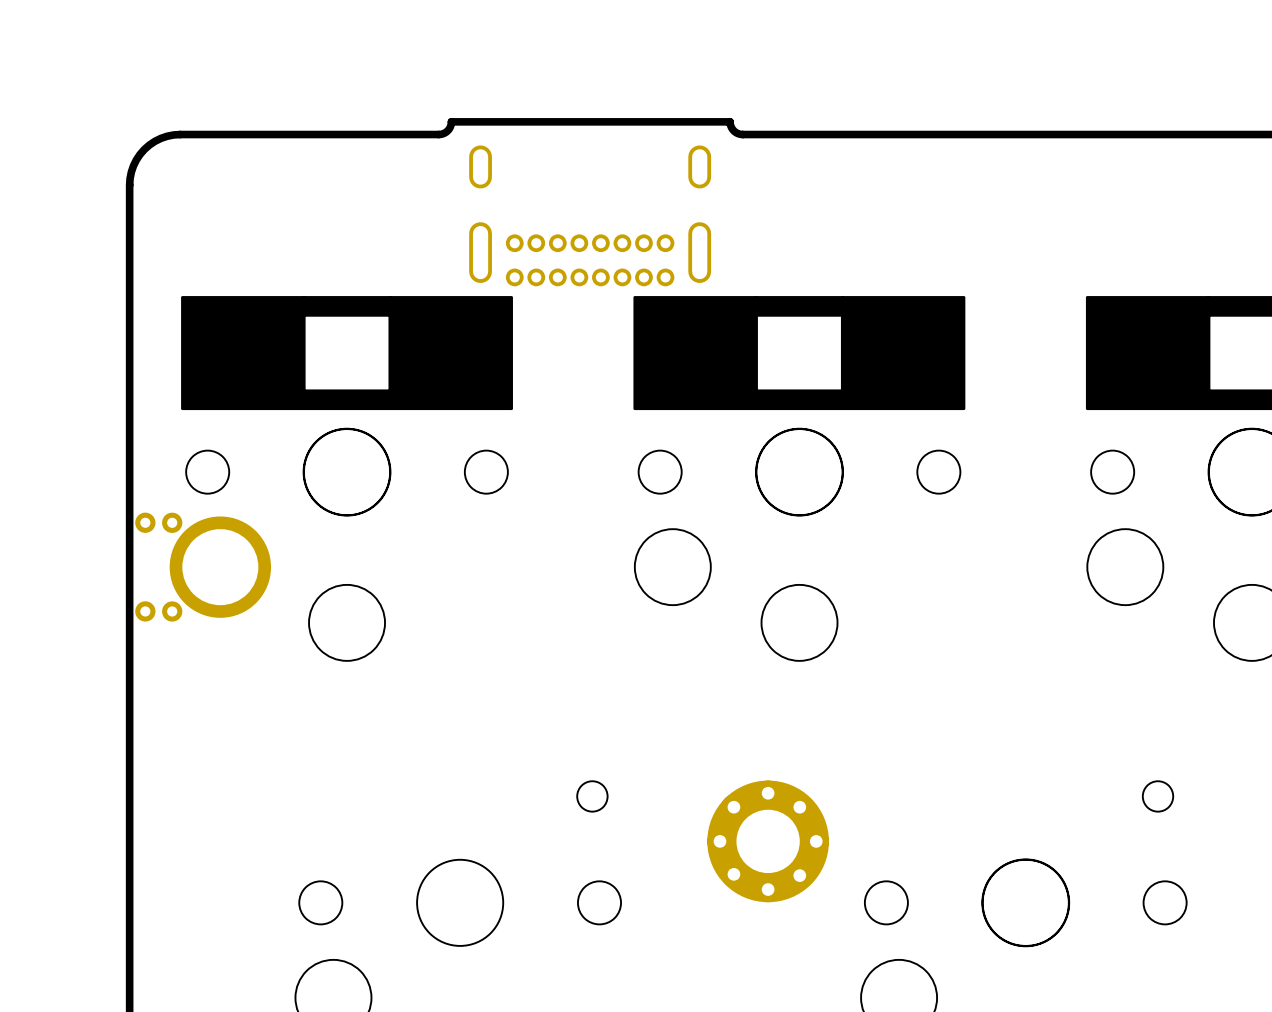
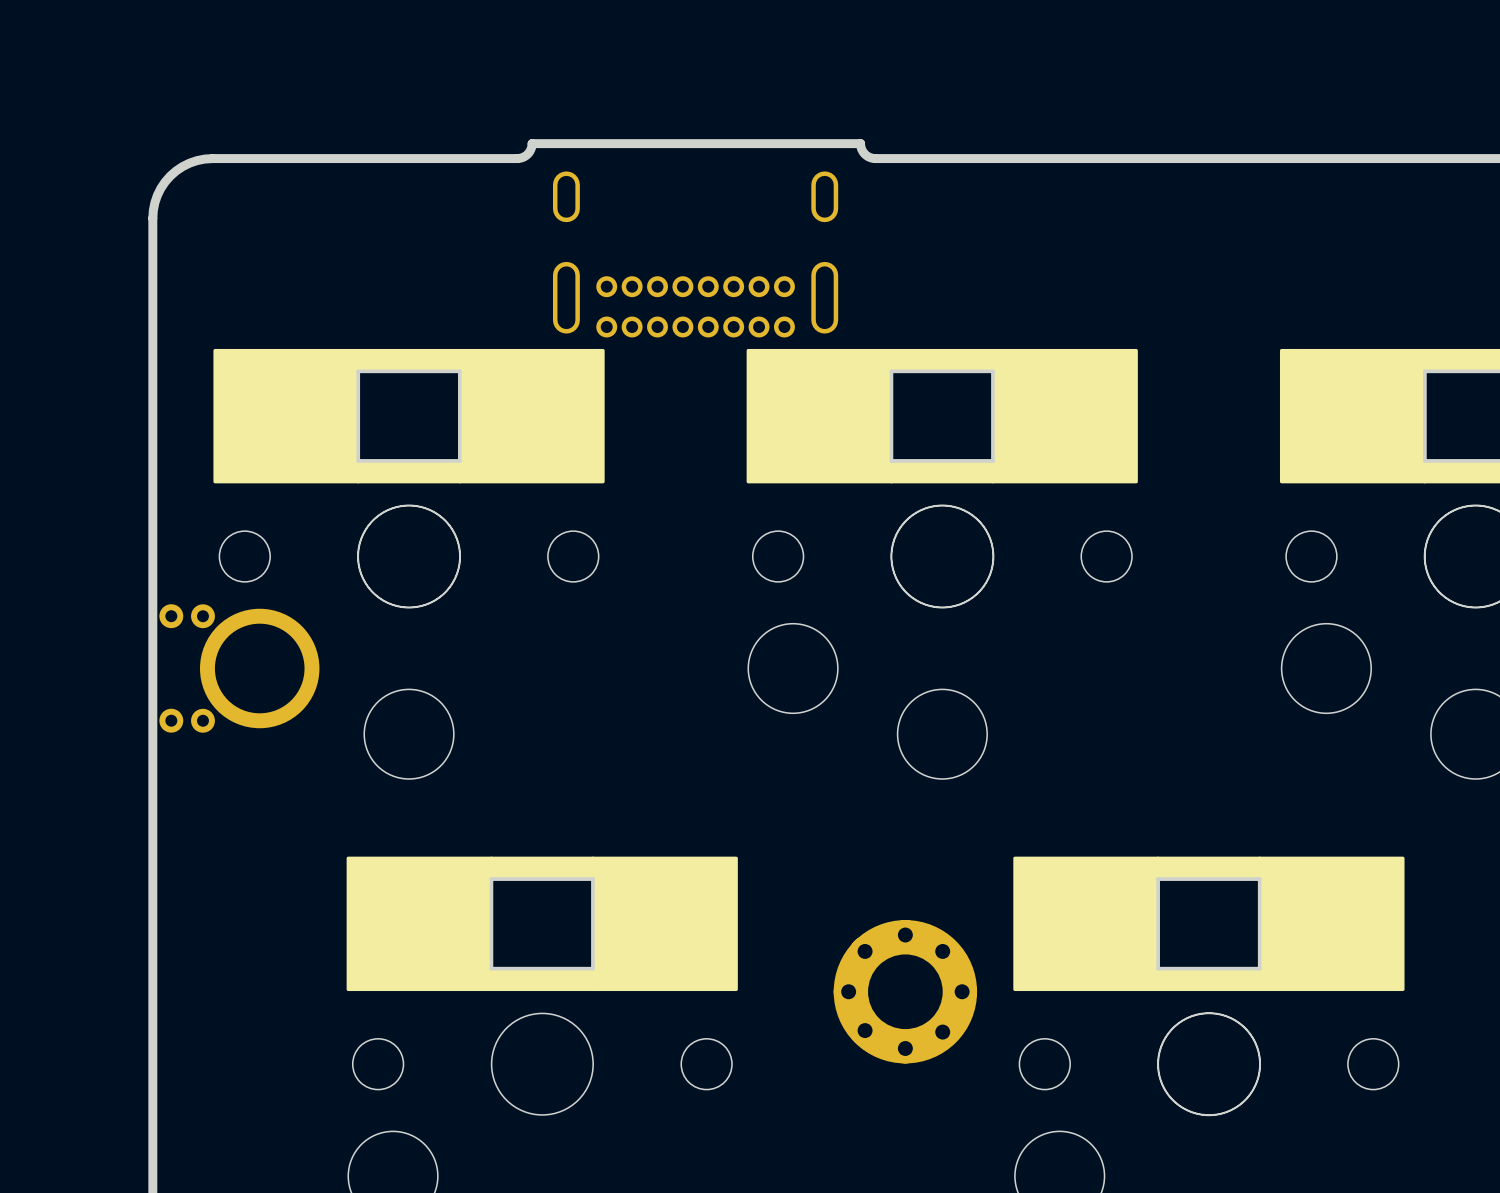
part: none -> (542, 923)
part: none -> (1208, 923)

